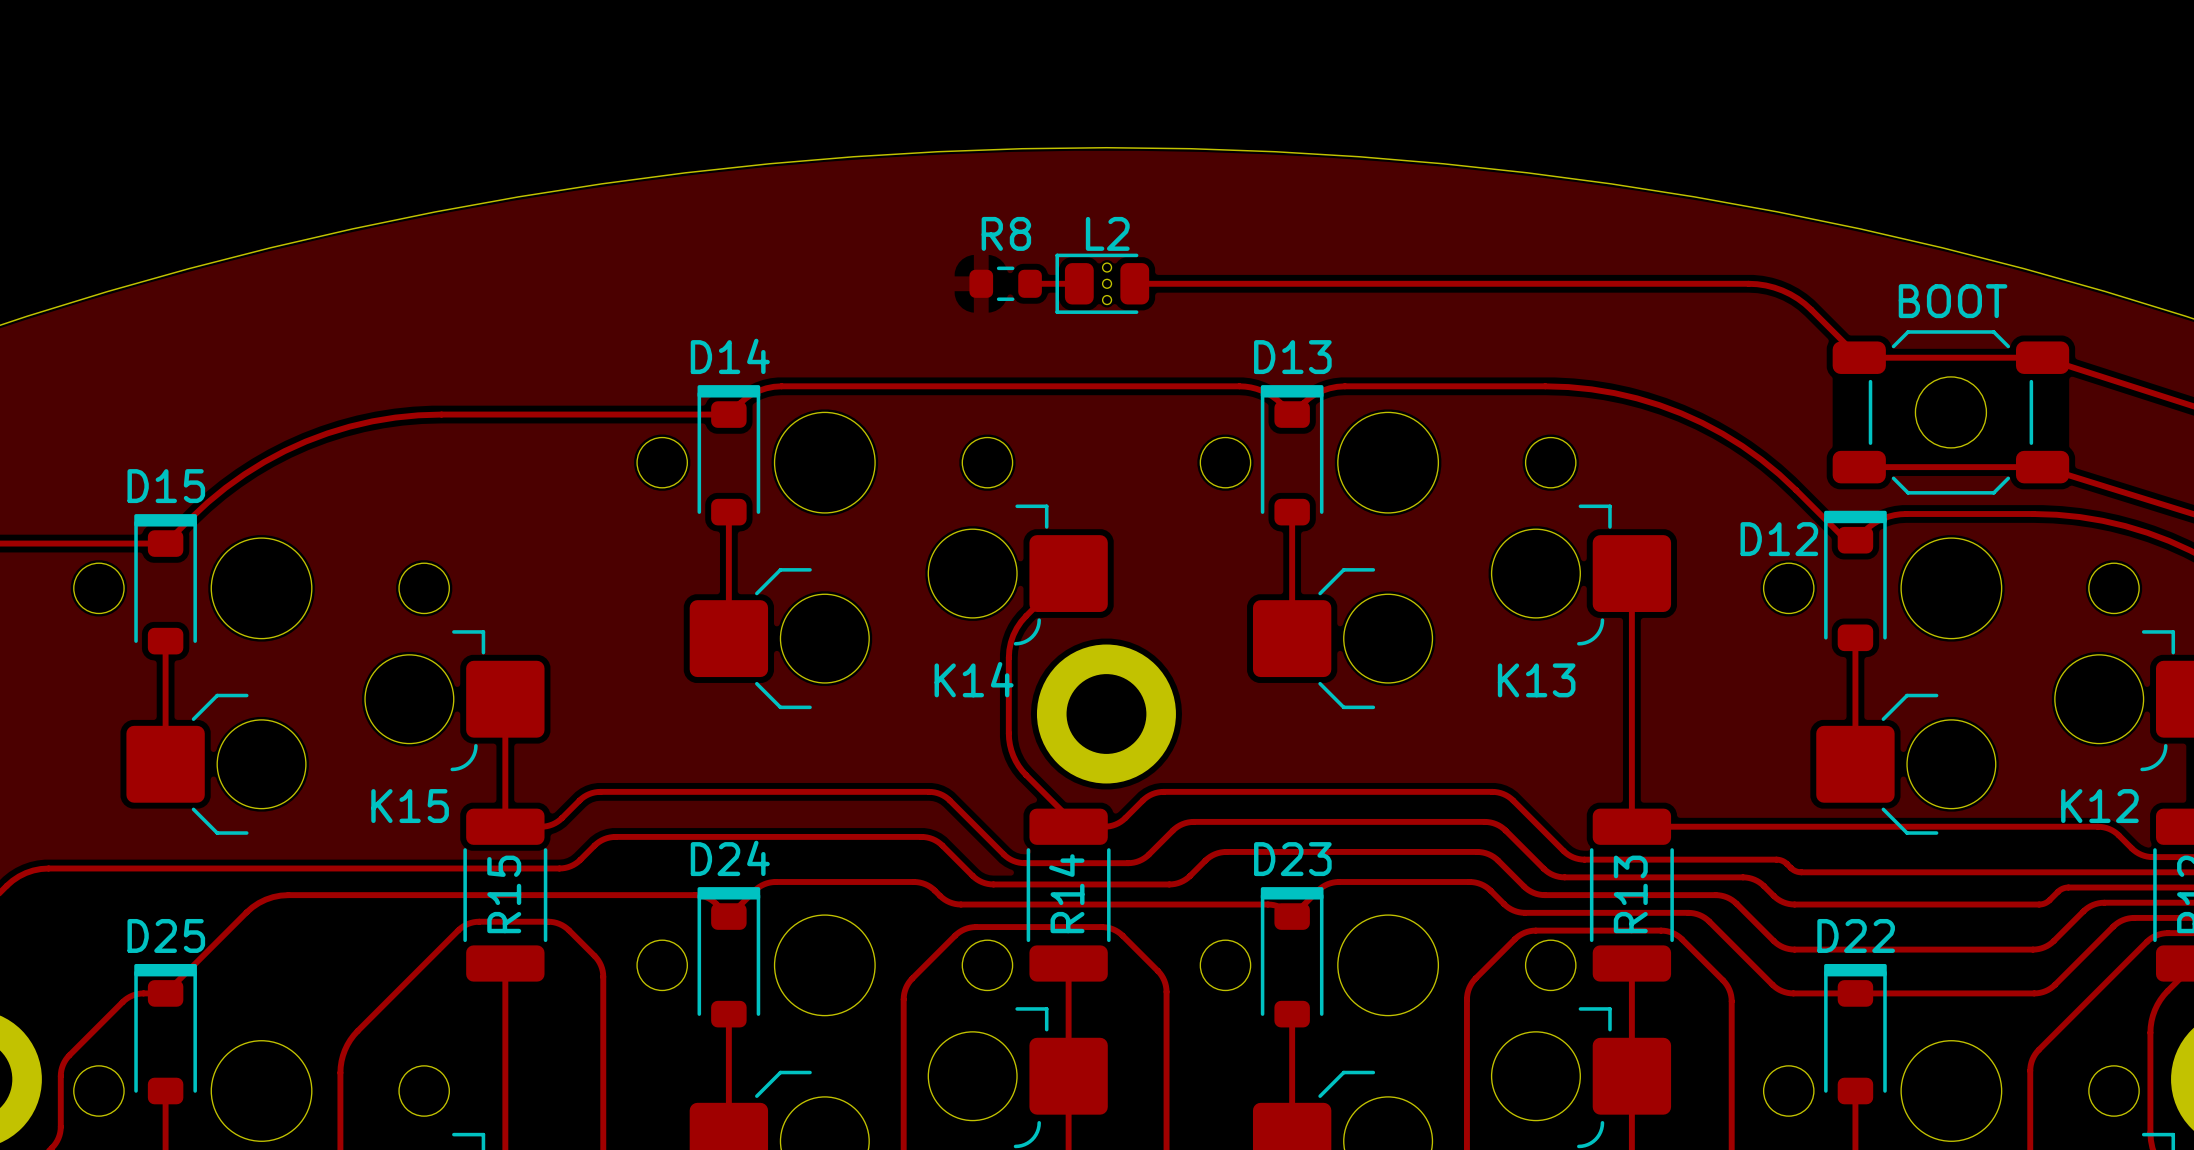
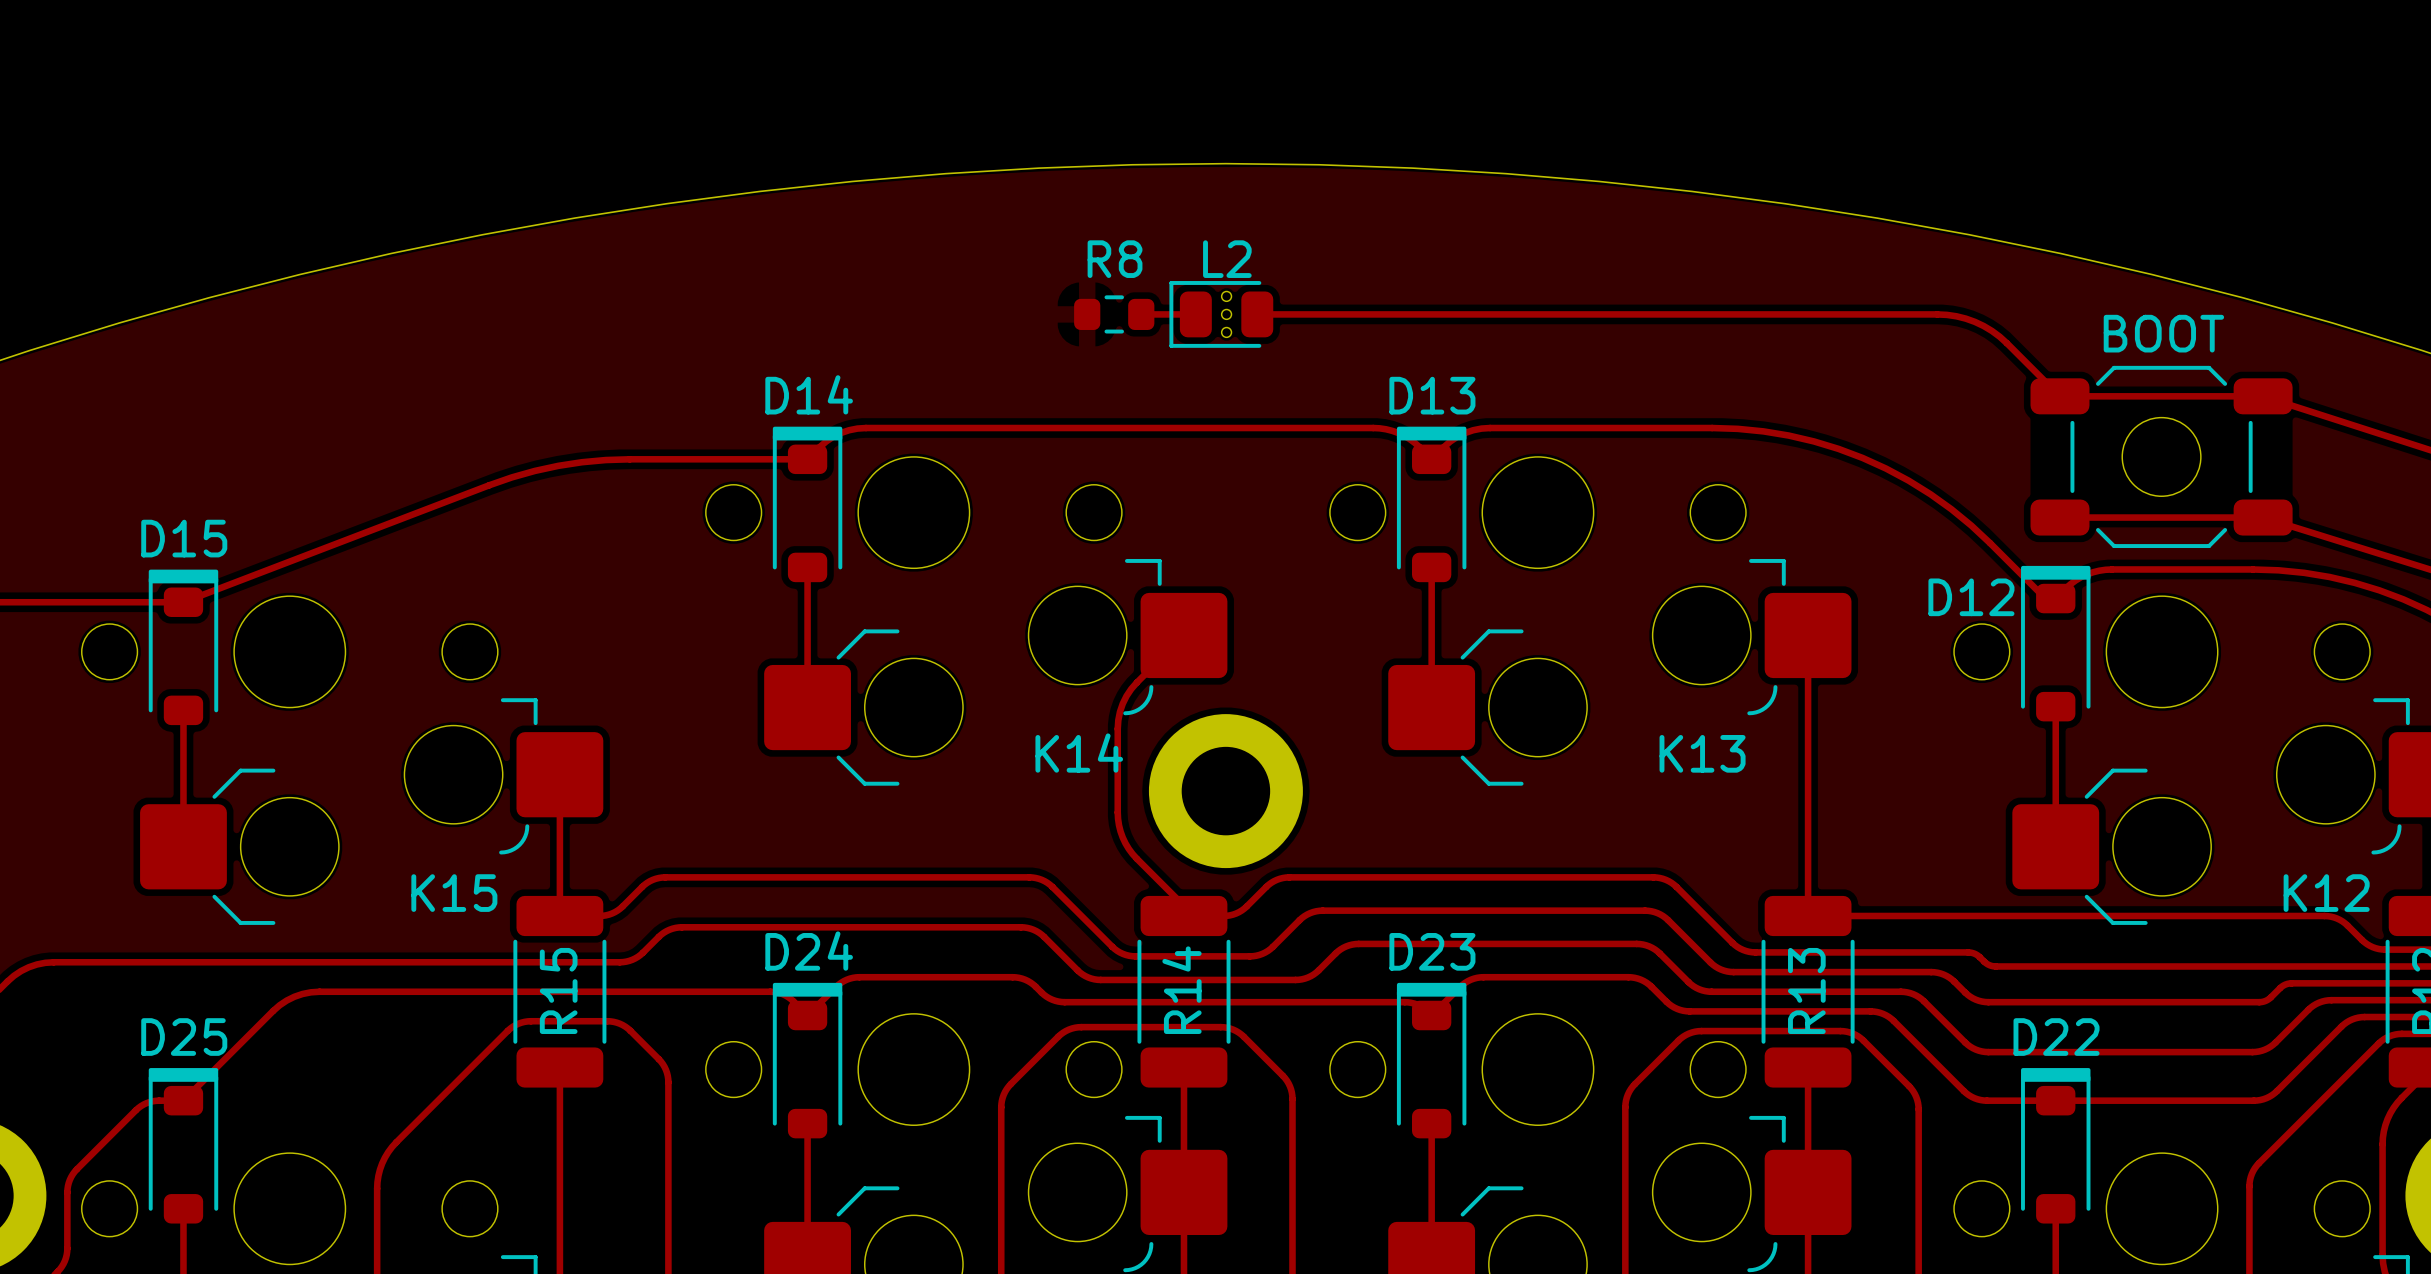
top track: (568, 414) (418, 415) (372, 421) (327, 433) (284, 451) (244, 474) (207, 502) (165, 543) -> (629, 459) (582, 462) (511, 477) (183, 602)

